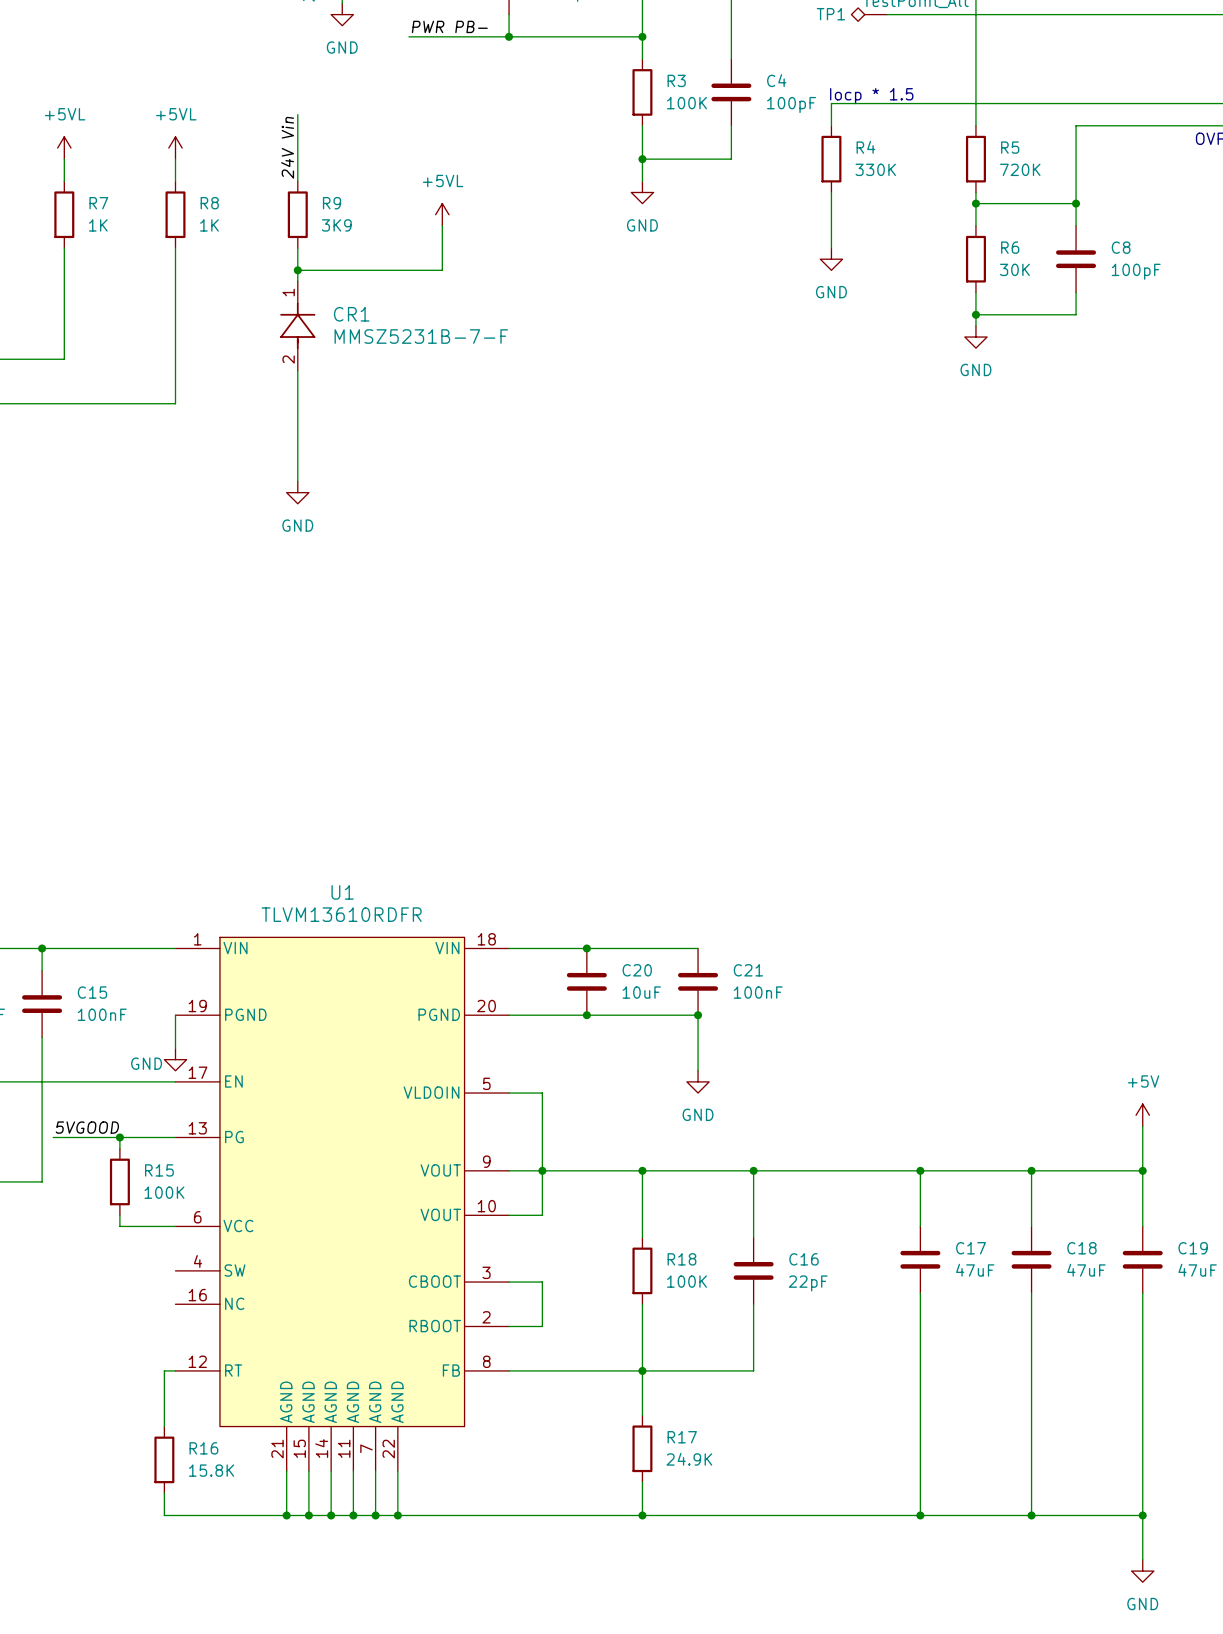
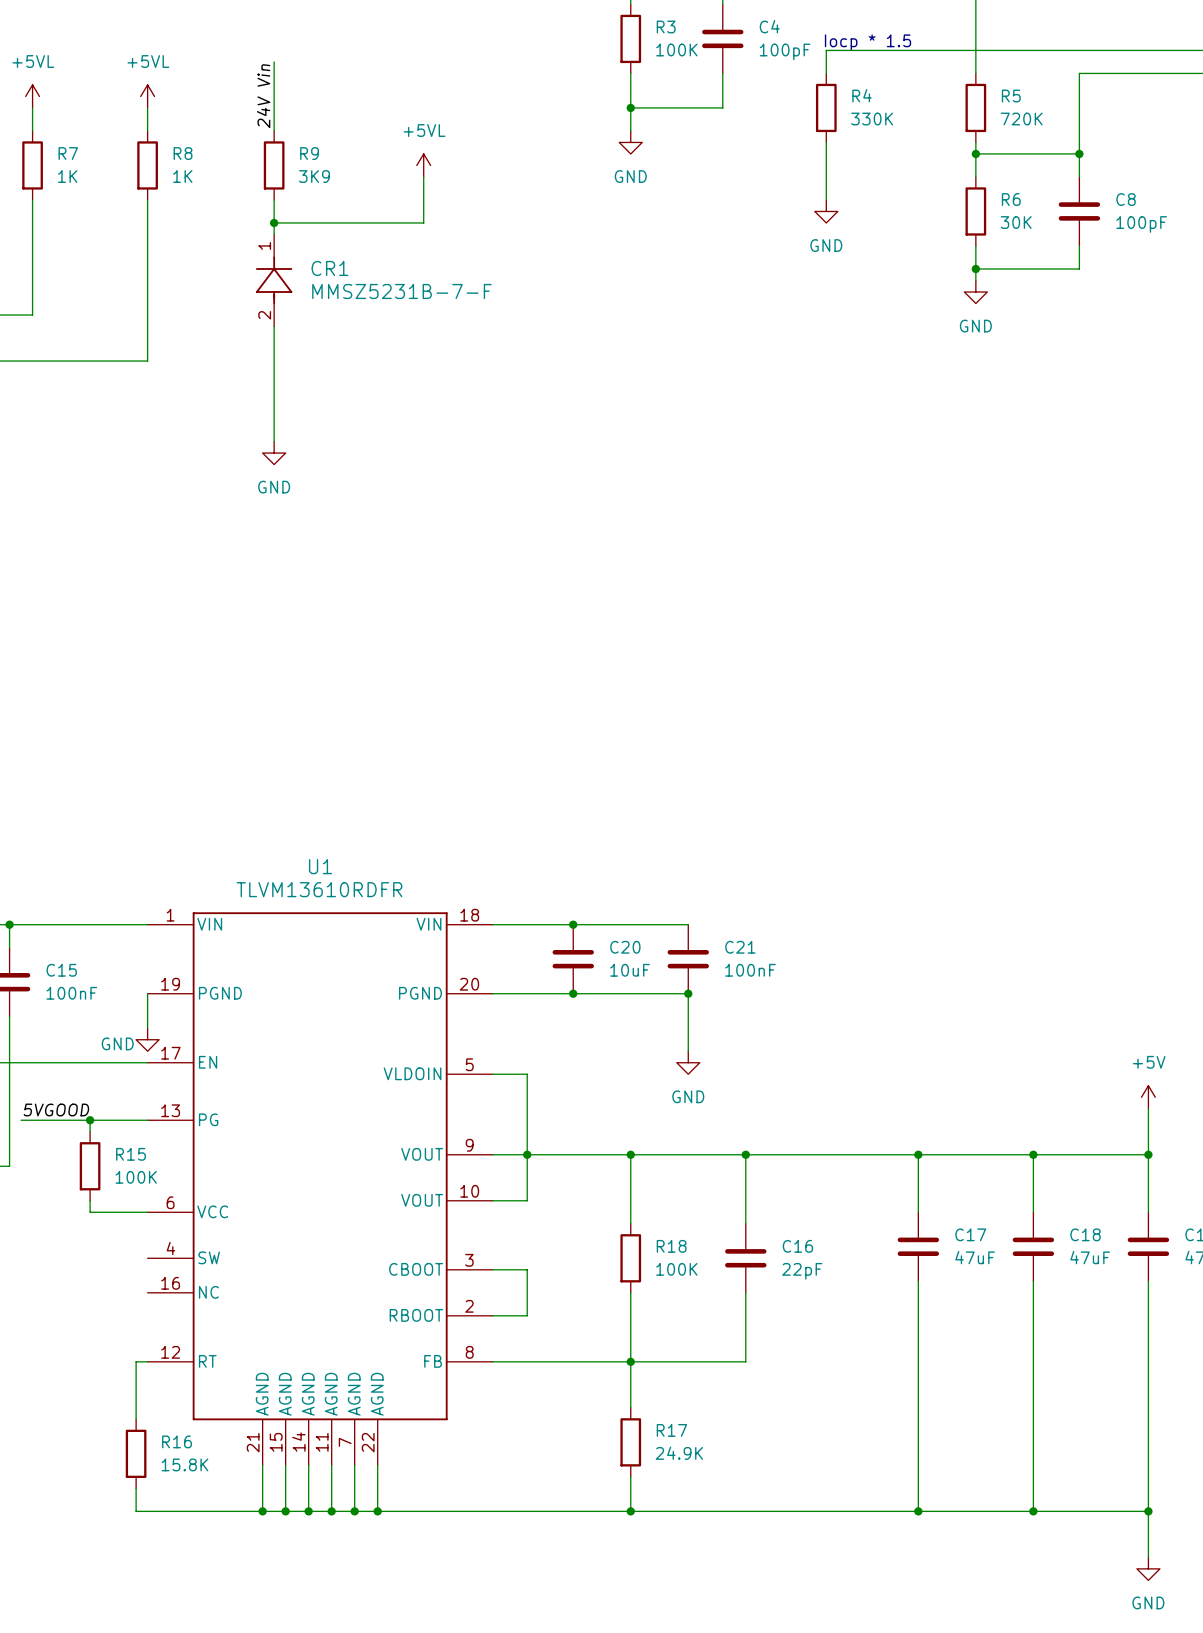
U1 symbol: [175, 937, 510, 1472] -> [147, 912, 493, 1466]

